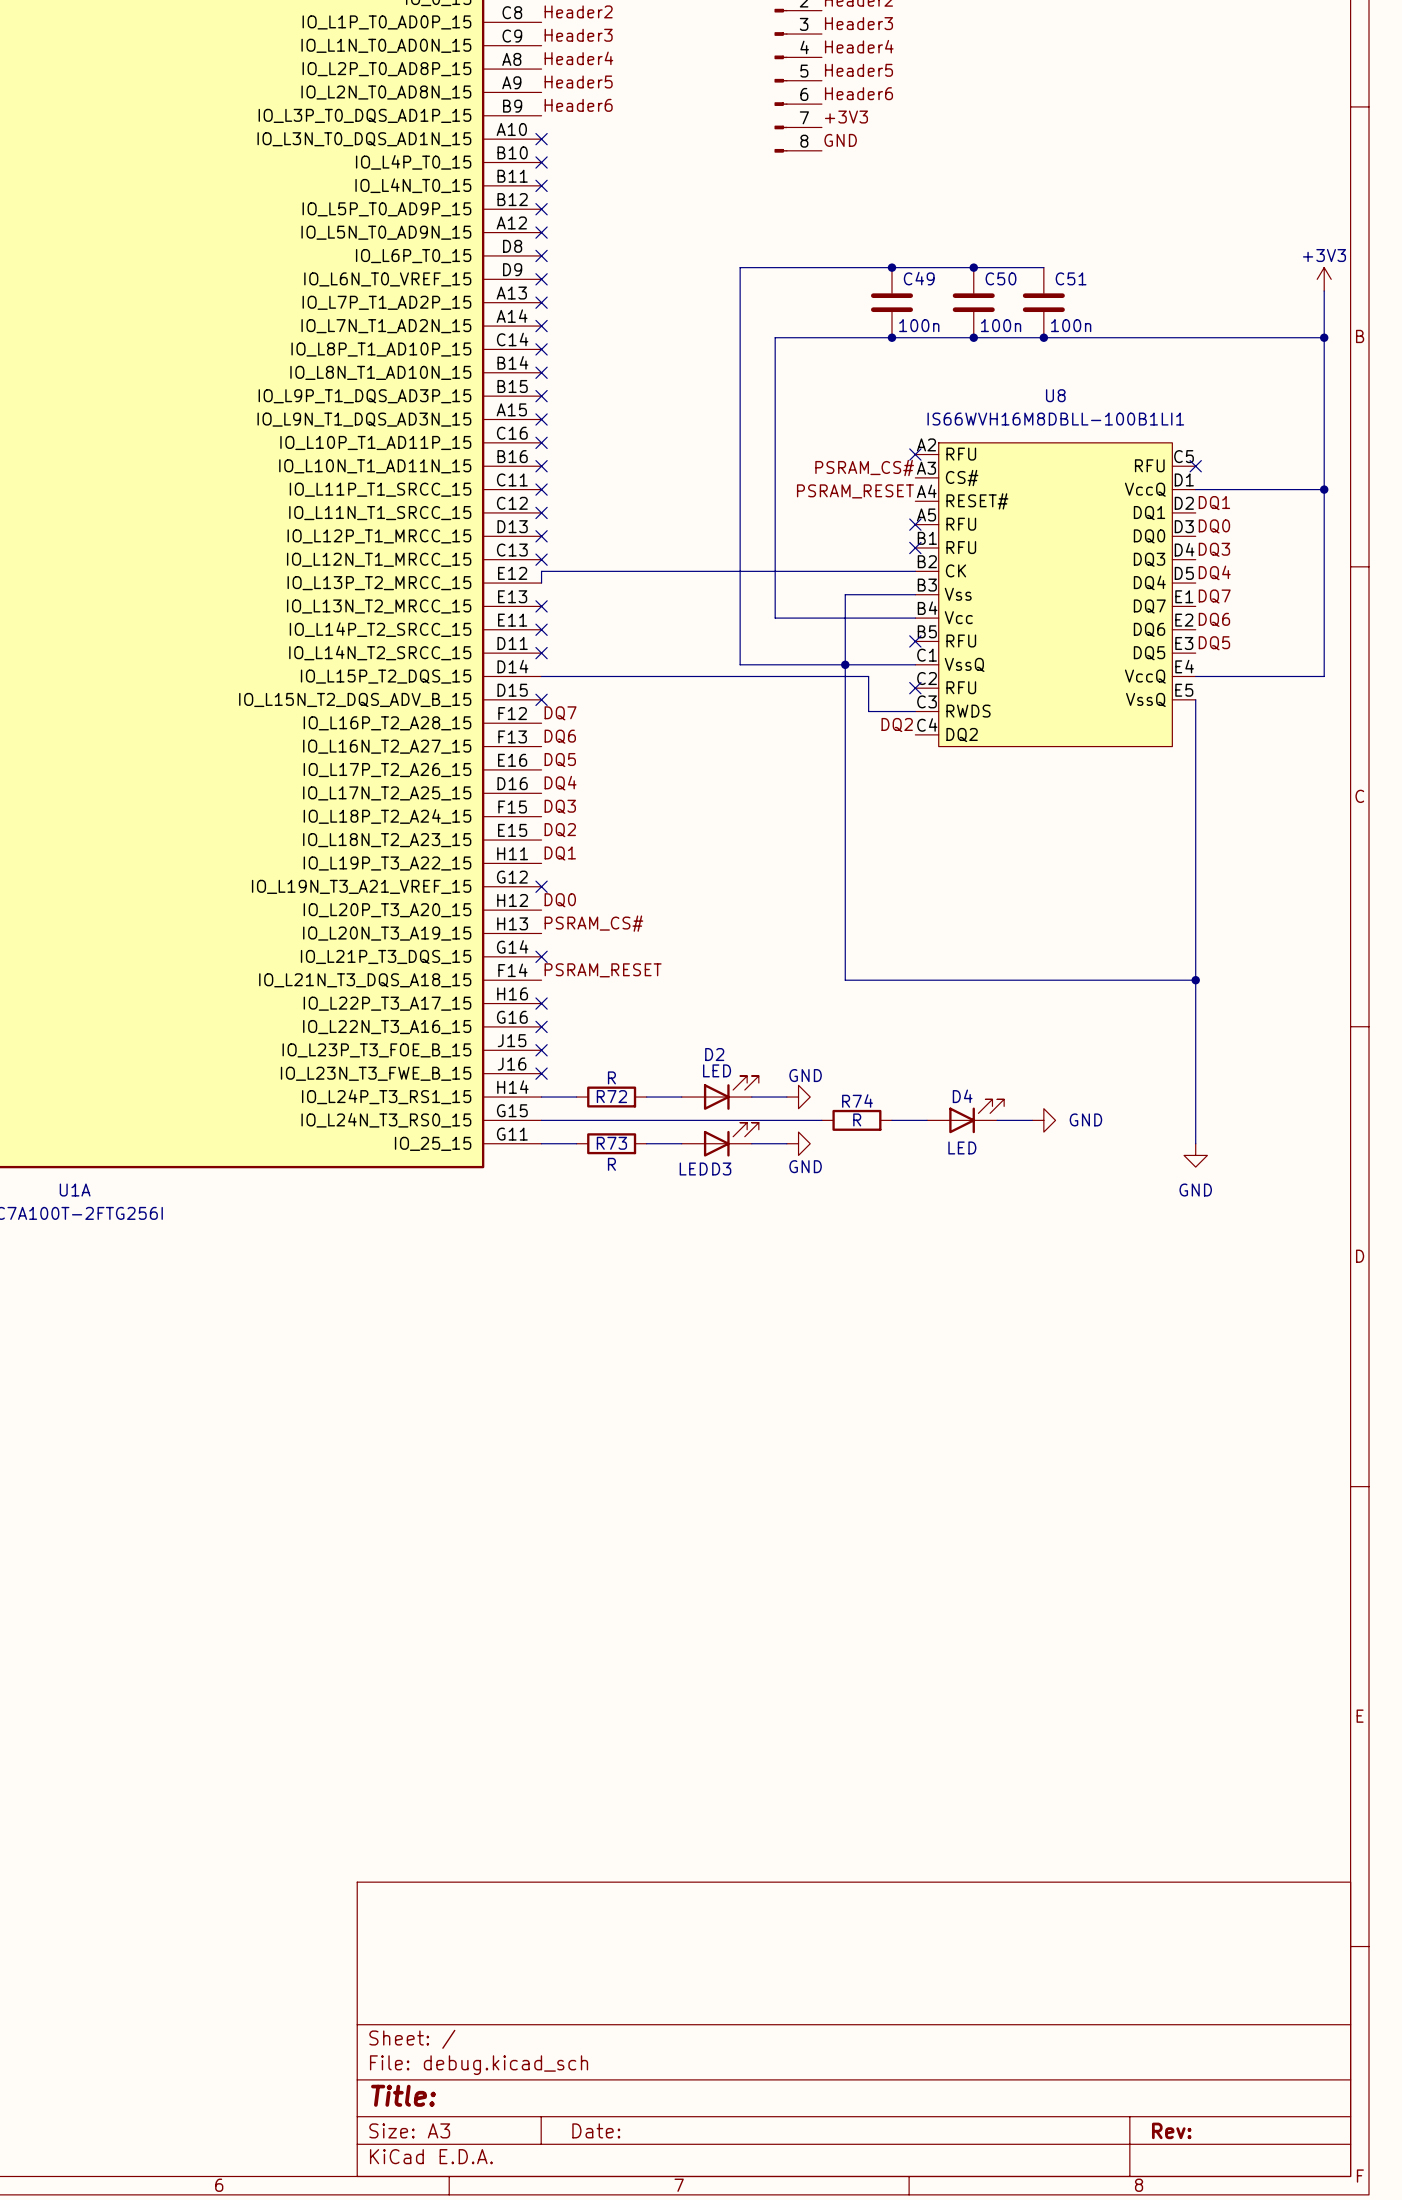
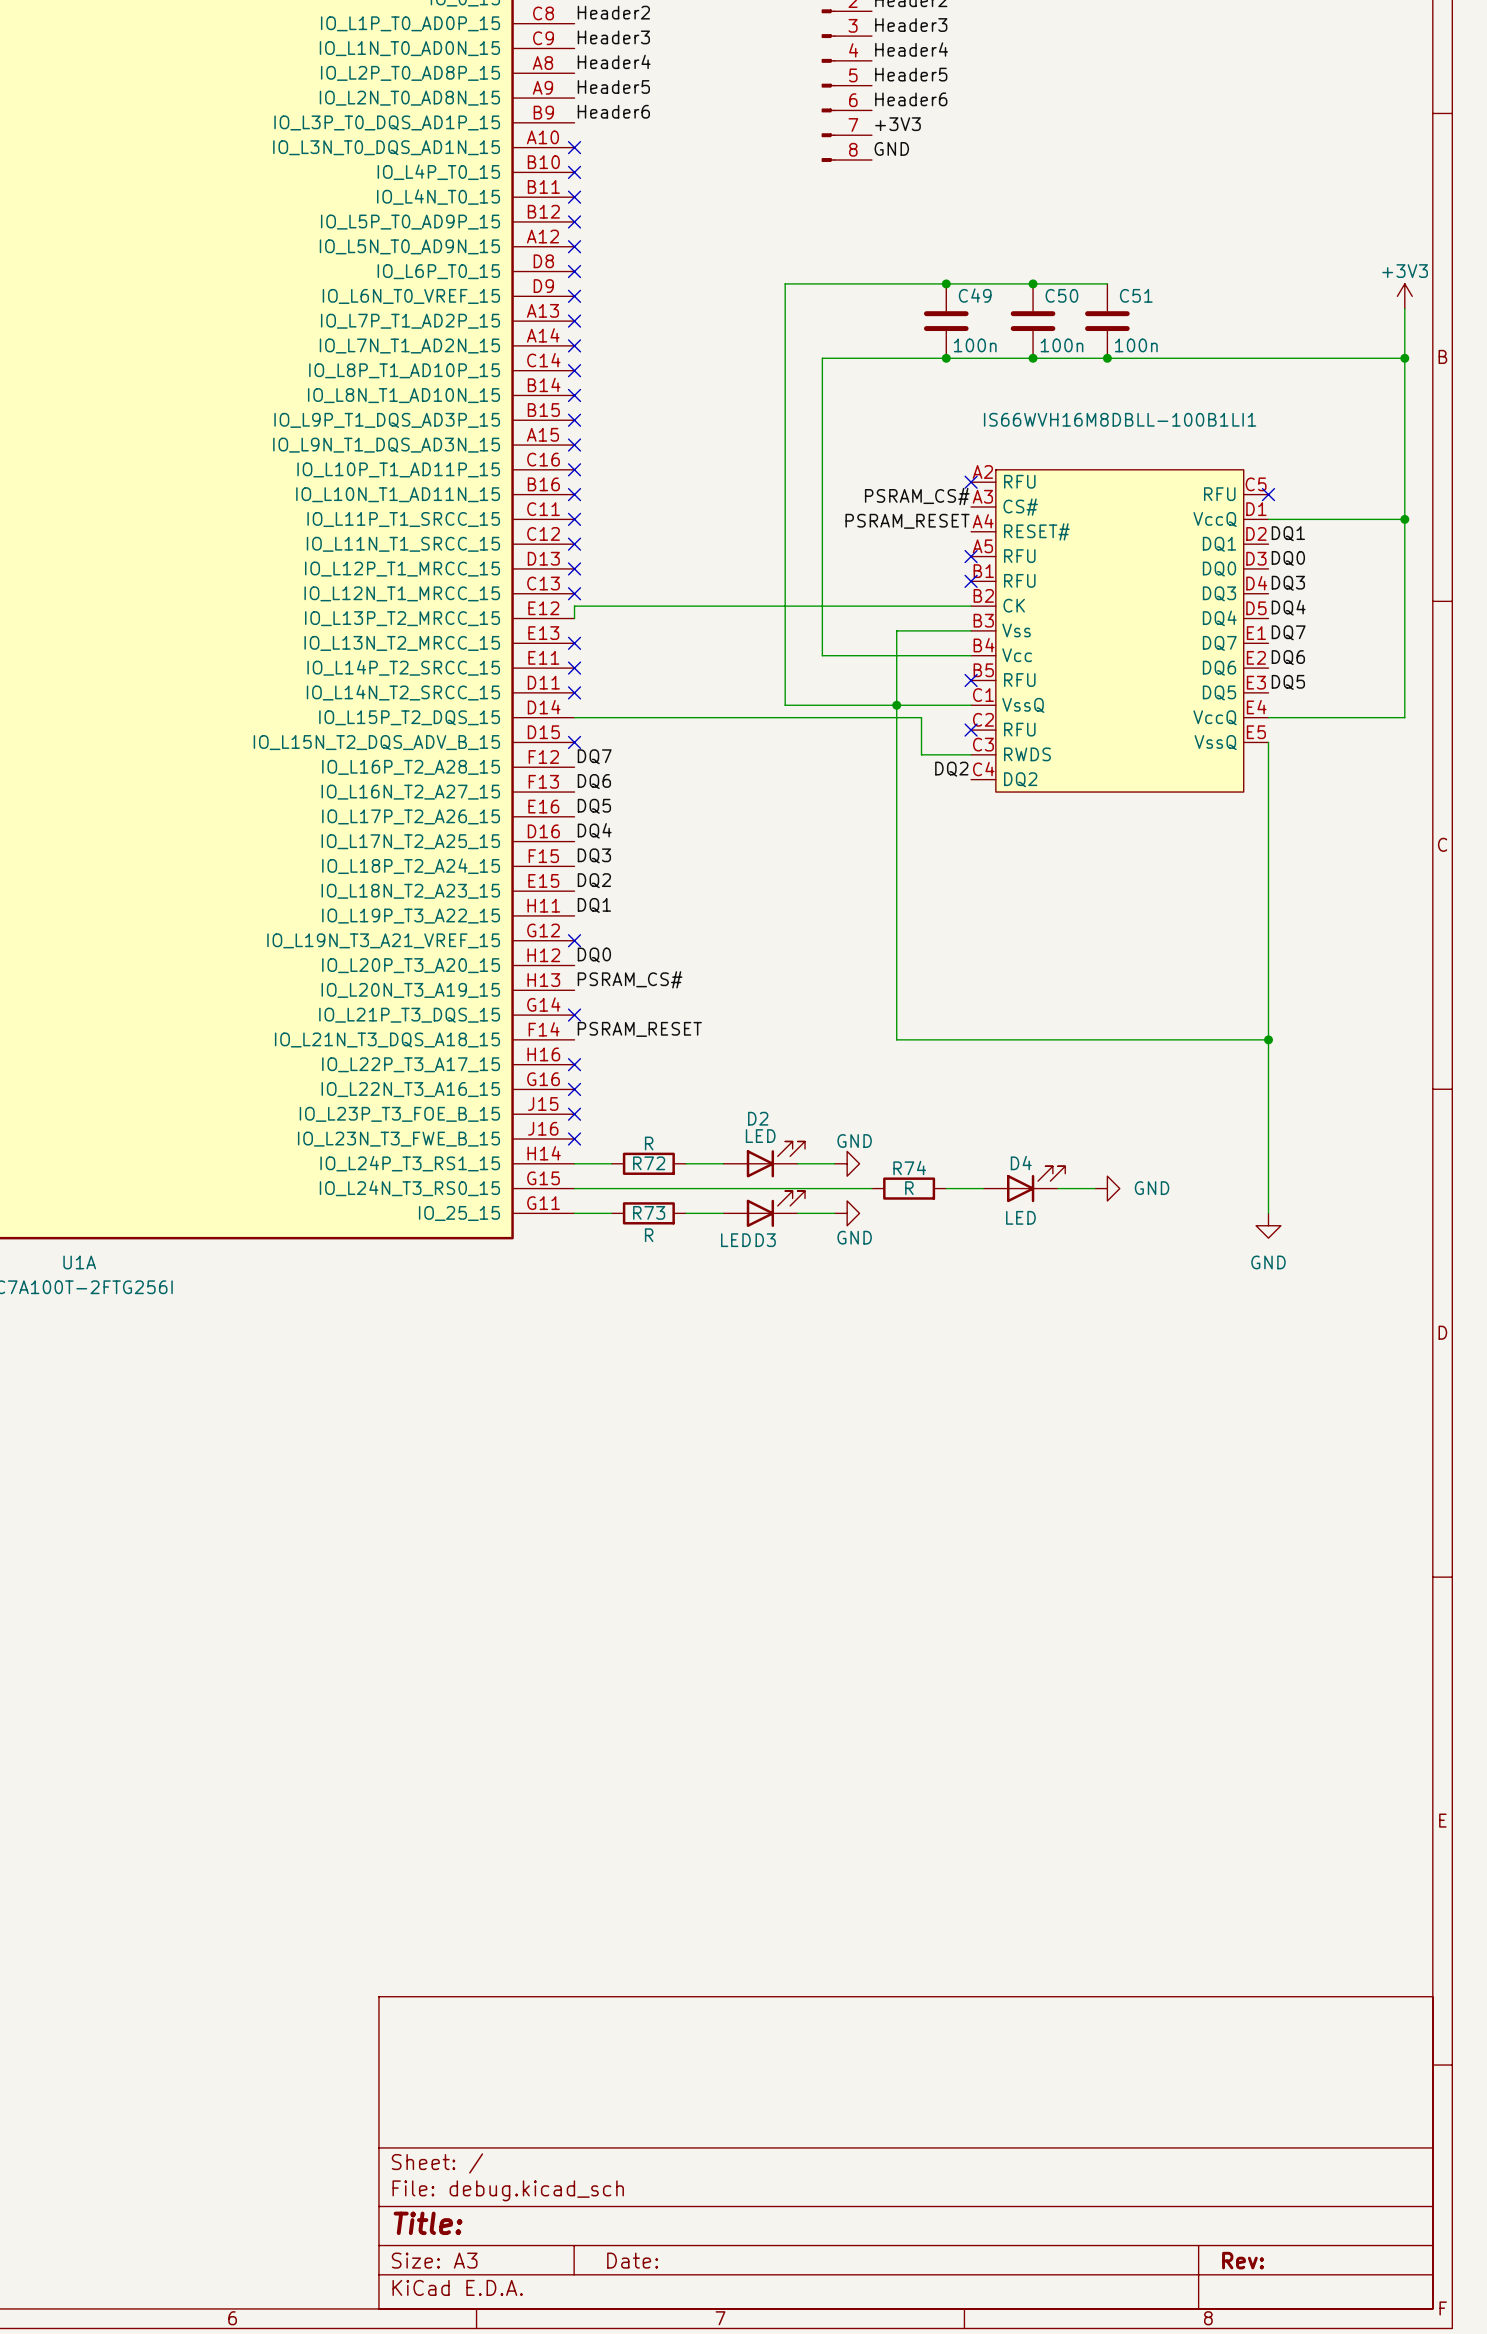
U8 name: U8 (1055, 395) -> IS66WVH16M8DBLL-100B1LI1 (1120, 419)
U8 value: IS66WVH16M8DBLL-100B1LI1 (1055, 419) -> none

